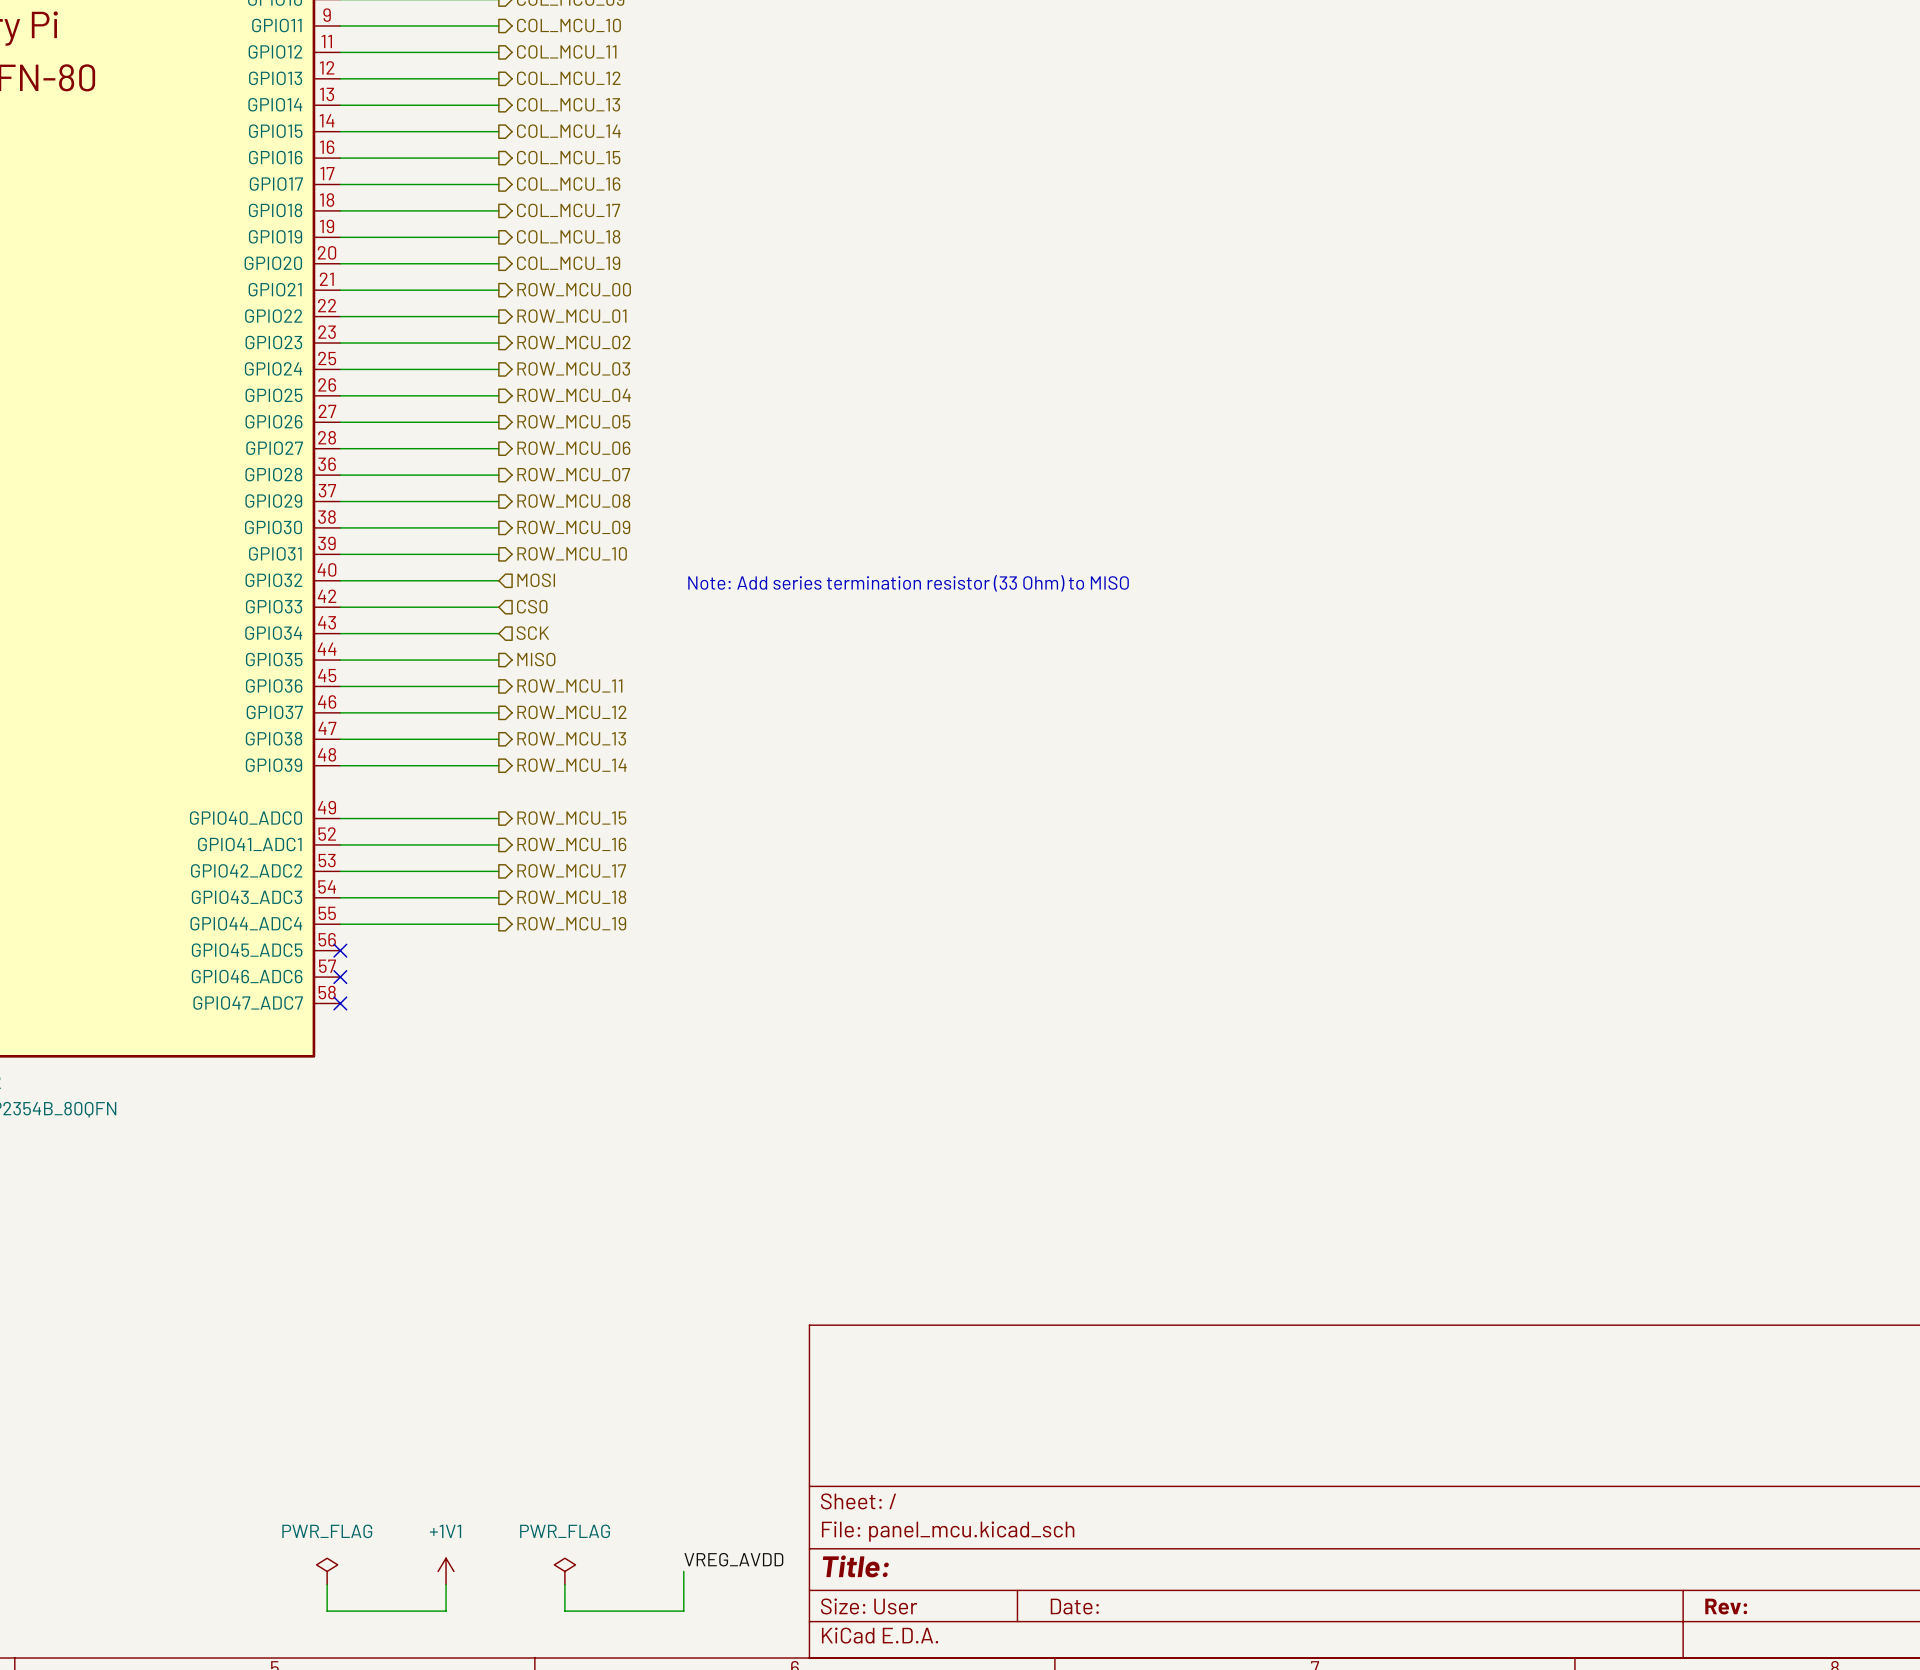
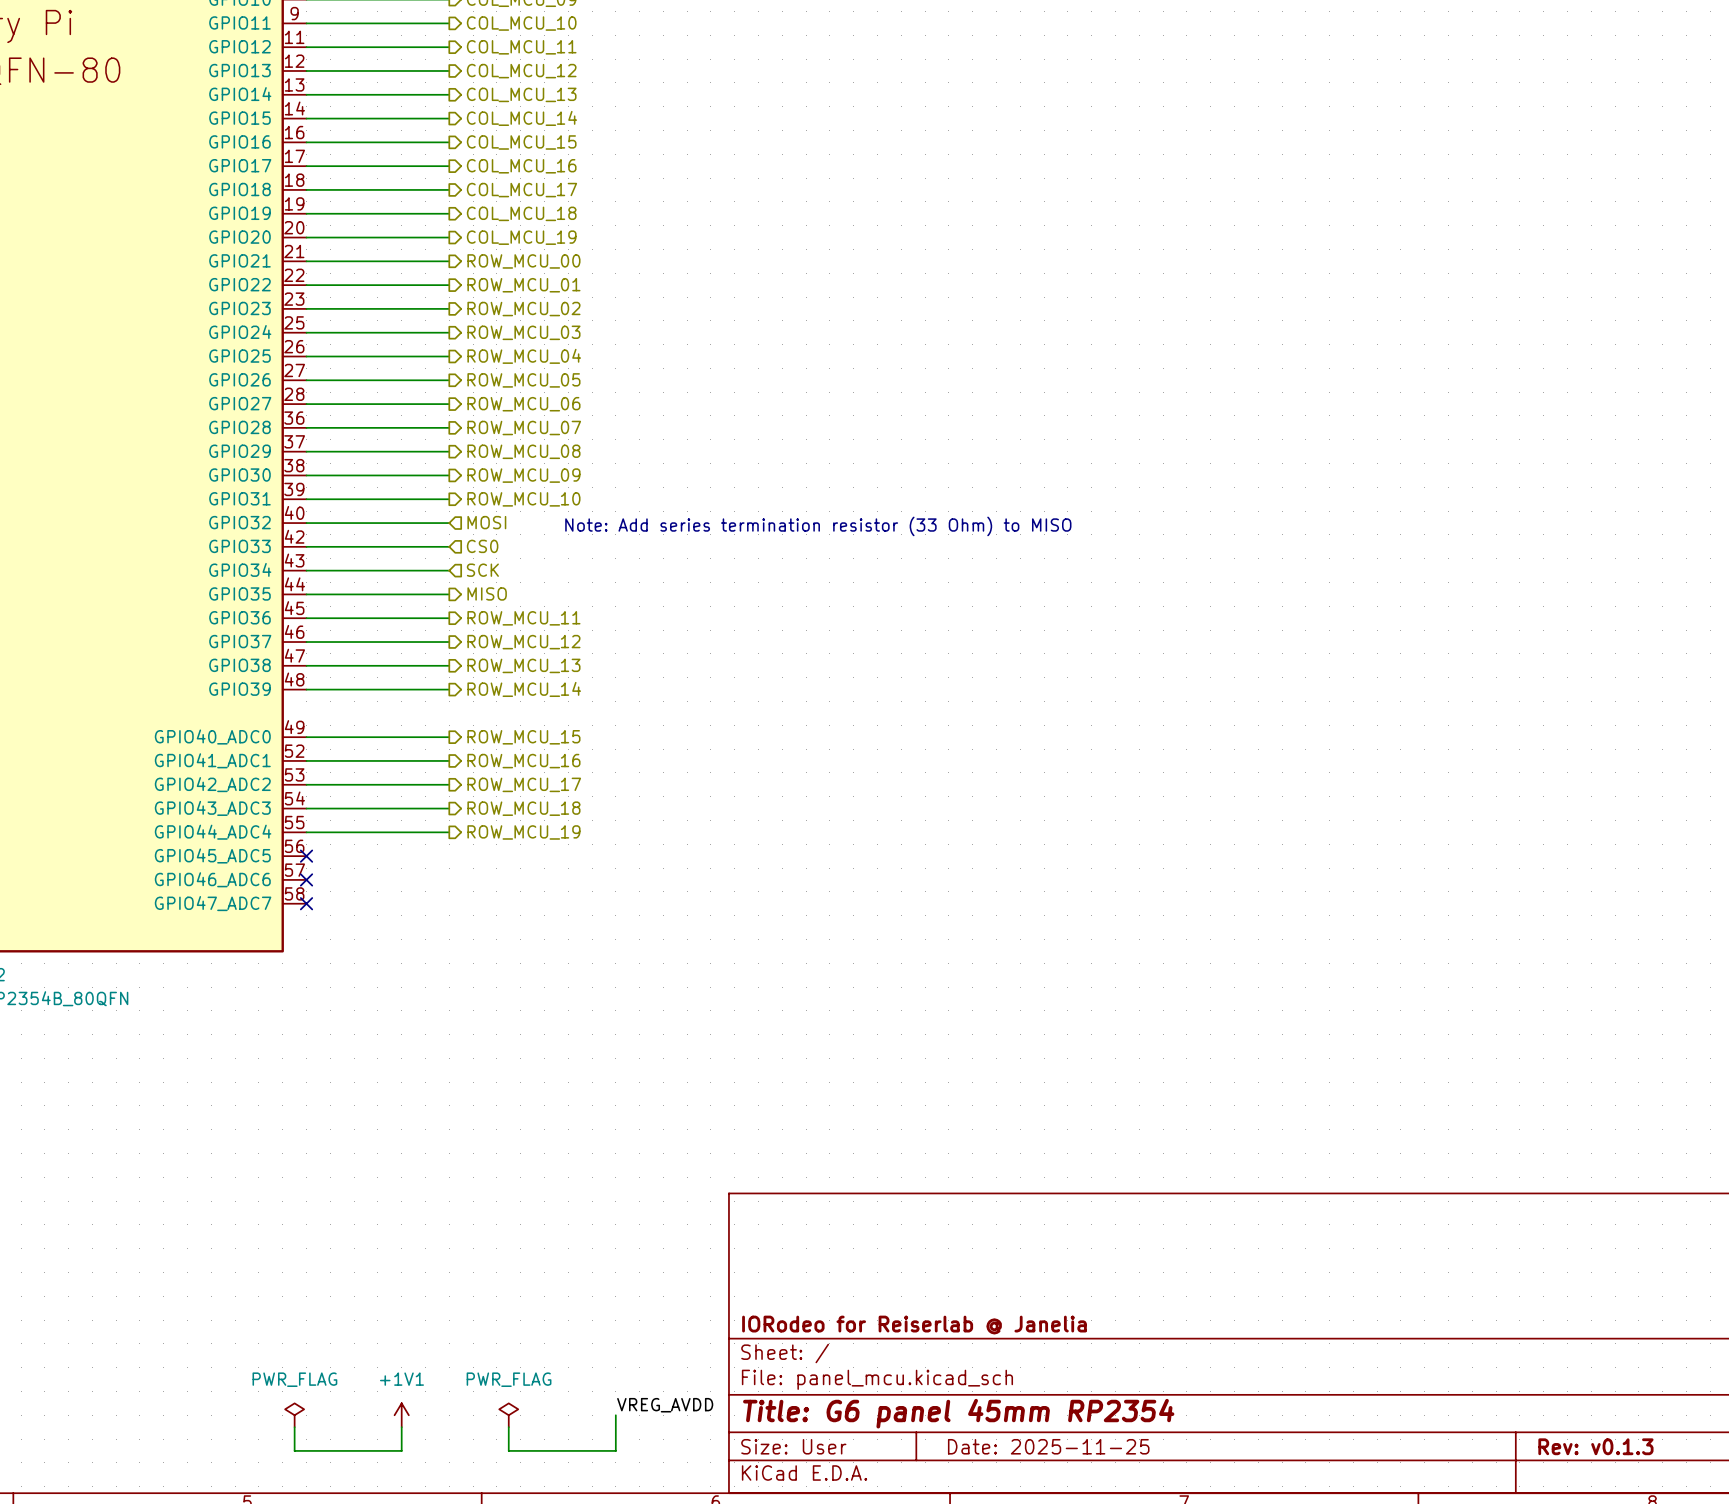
title block: none -> IORodeo for Reiserlab @ Janelia (914, 1325)
title block: Title: (855, 1566) -> Title: G6 panel 45mm RP2354 (958, 1413)
title block: Date: (1074, 1606) -> Date: 2025-11-25 (1048, 1446)
title block: Rev: (1726, 1606) -> Rev: v0.1.3 (1595, 1446)

